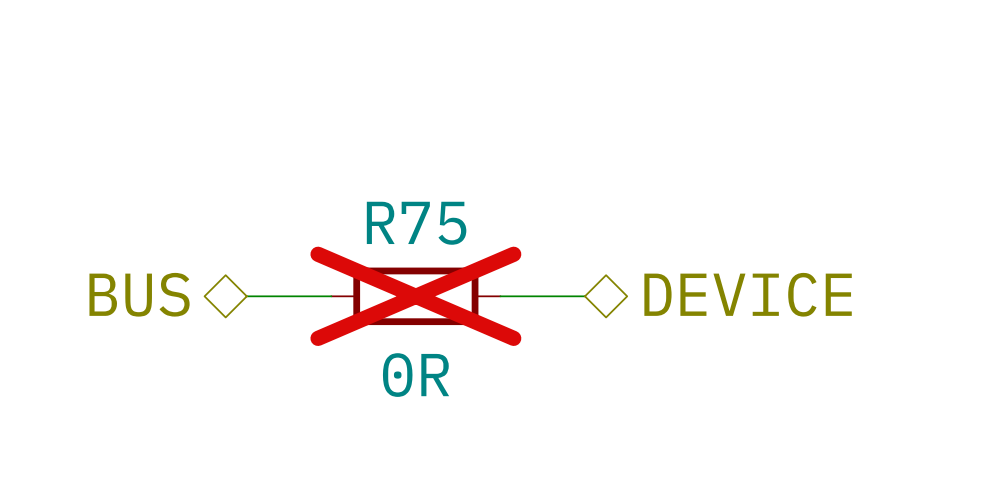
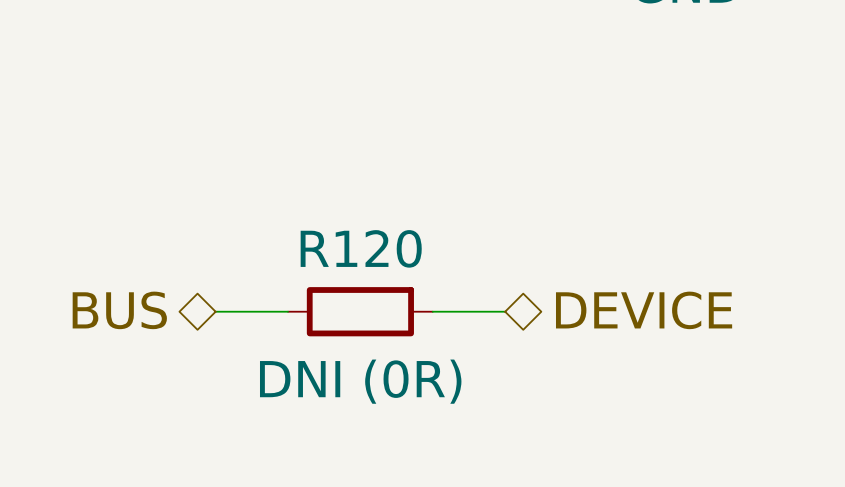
R75 name: R75 (416, 223) -> R120 (361, 248)
R75 do-not-place cross: (415, 296) -> none
R75 value: 0R (416, 375) -> DNI (0R) (360, 381)

